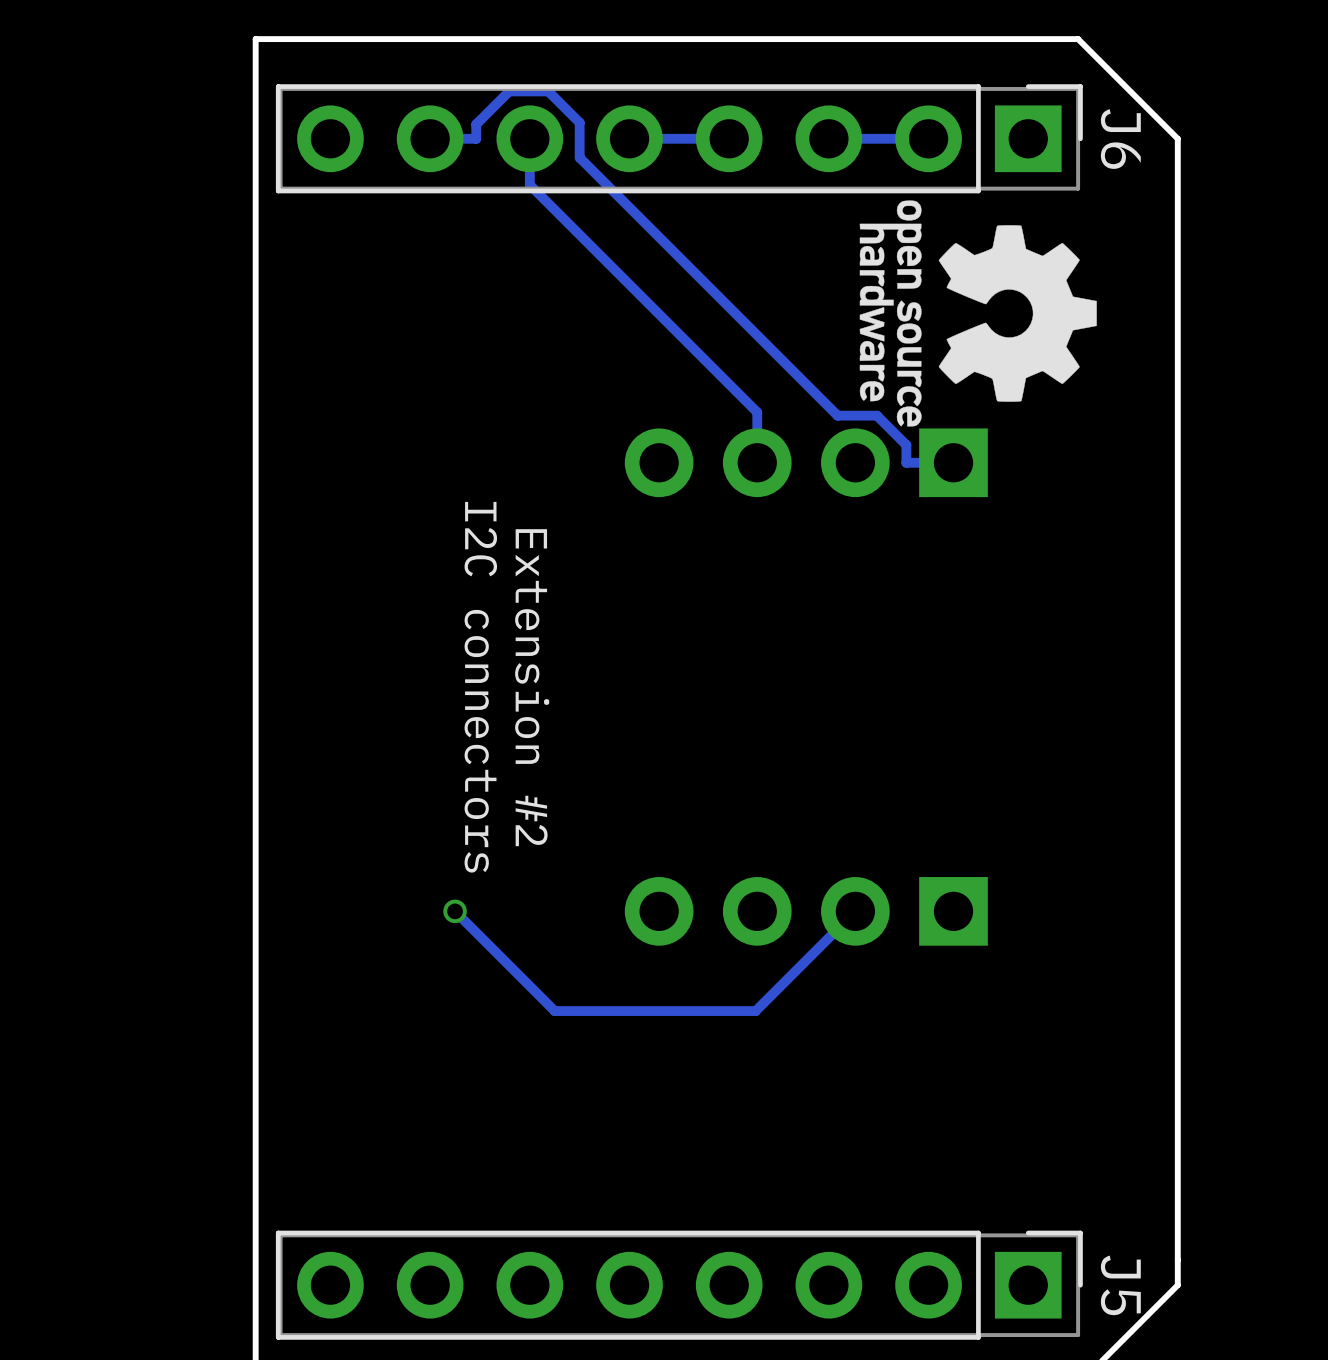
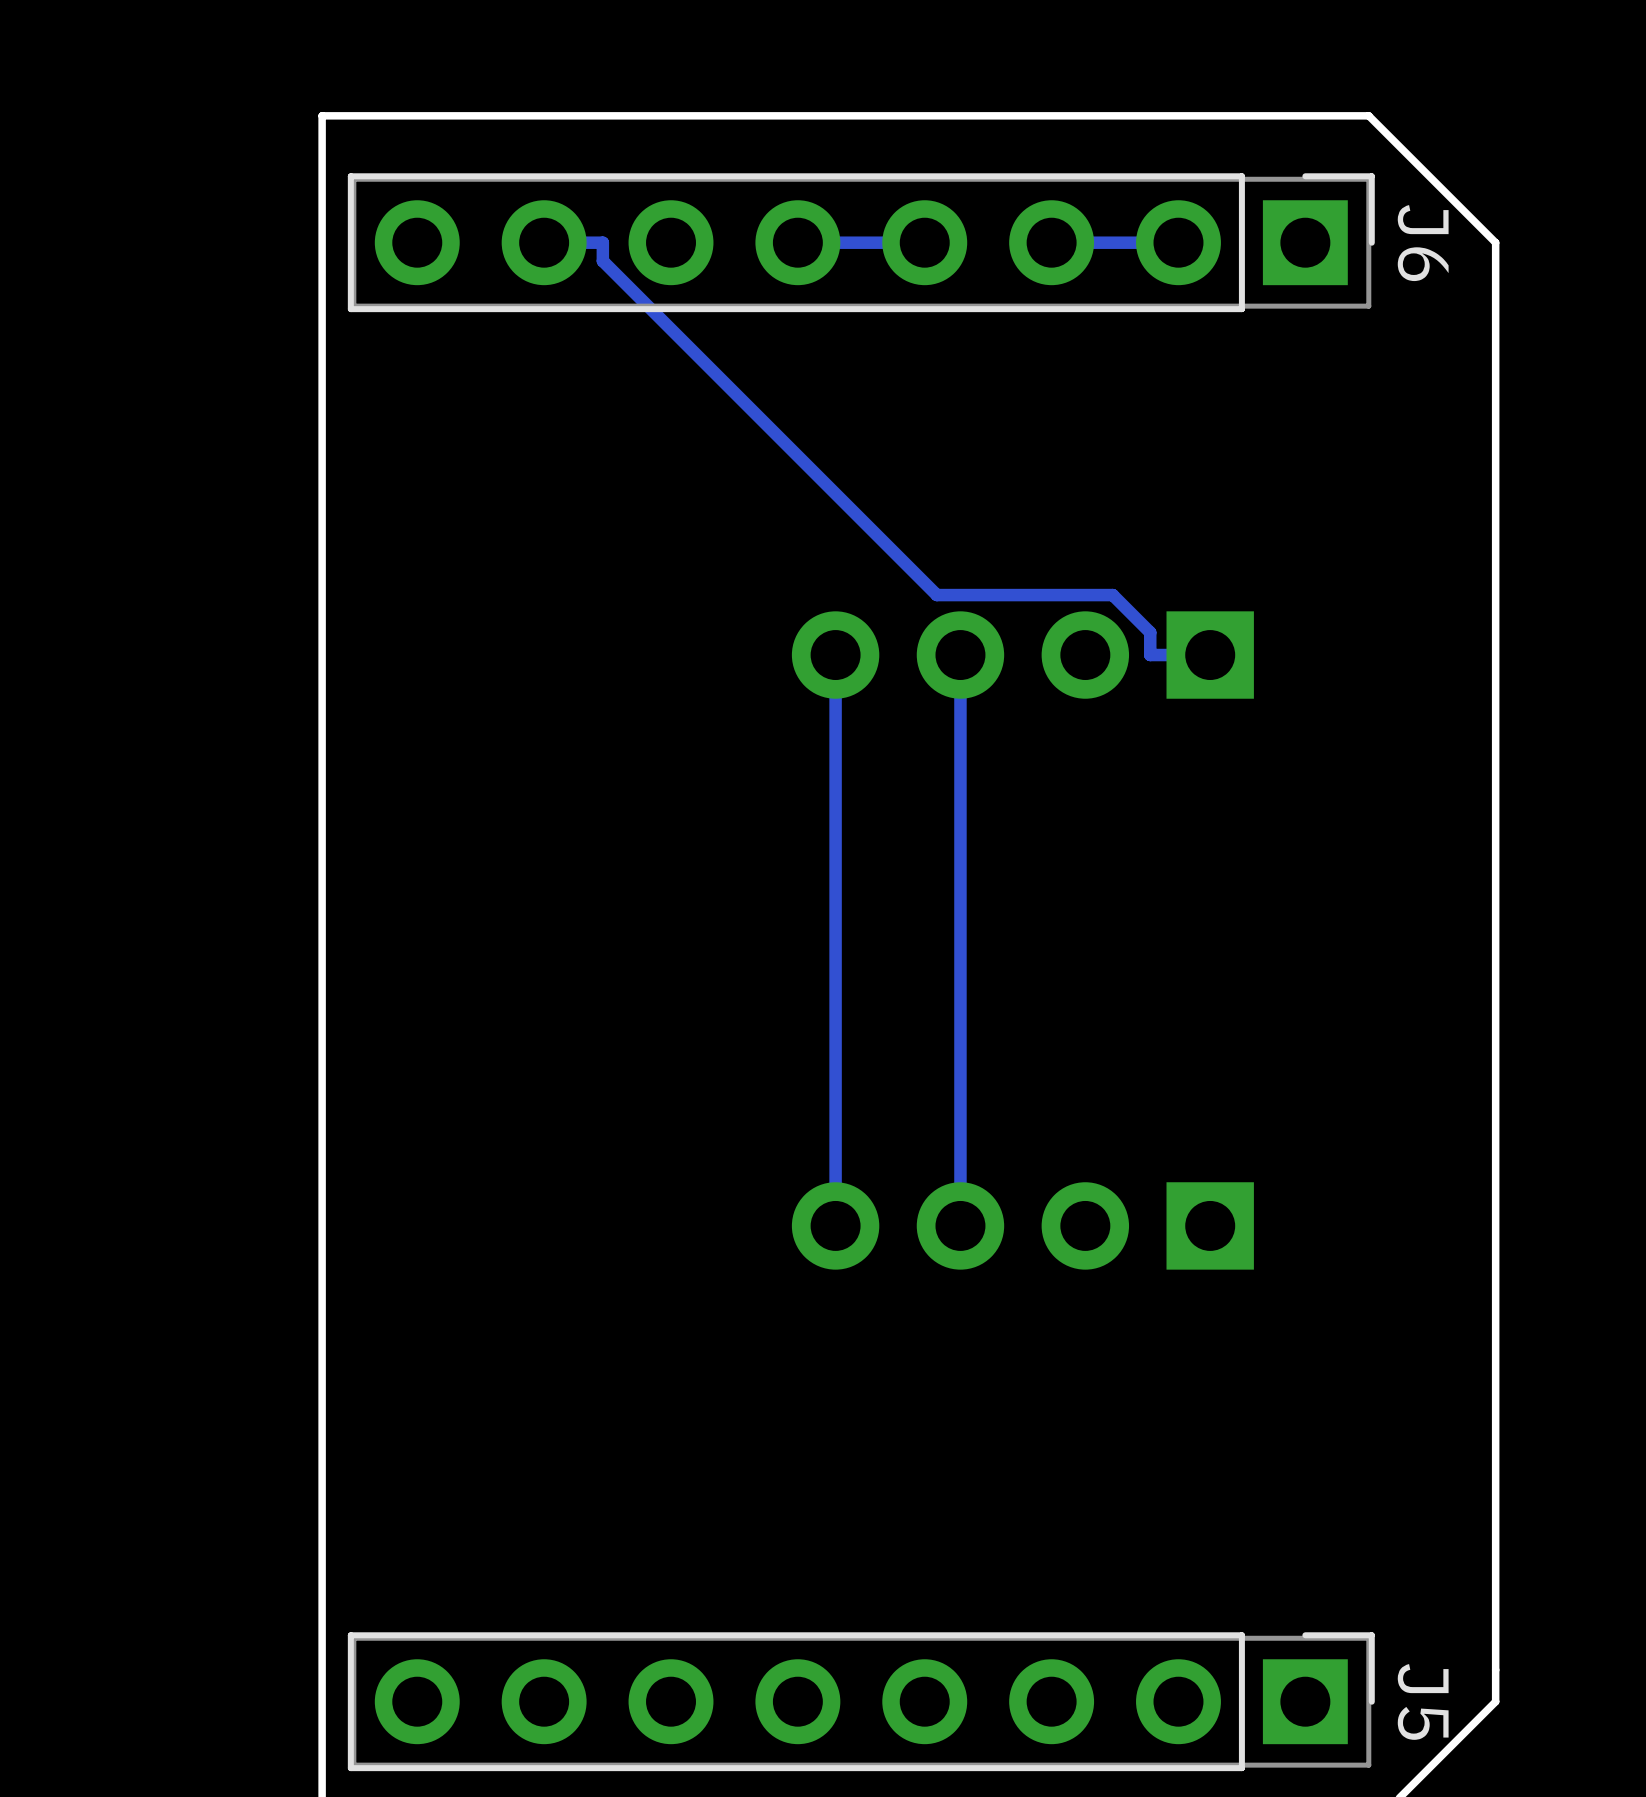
track: (476, 138) (476, 124) (509, 91) (548, 91) (579, 122) (579, 157) (837, 415) -> (602, 242) (602, 261) (936, 595) (1062, 595)
track: (529, 138) (529, 184) (757, 412) (757, 462) -> (960, 1225) (960, 655)
drawing: [859, 200, 1097, 427] -> none
track: none -> (835, 655) (835, 1225)
text: I2C connectors (480, 687) -> none
text: Extension #2 (532, 687) -> none
via: (455, 911) -> none
track: (855, 911) (755, 1011) (554, 1011) (455, 911) -> none

